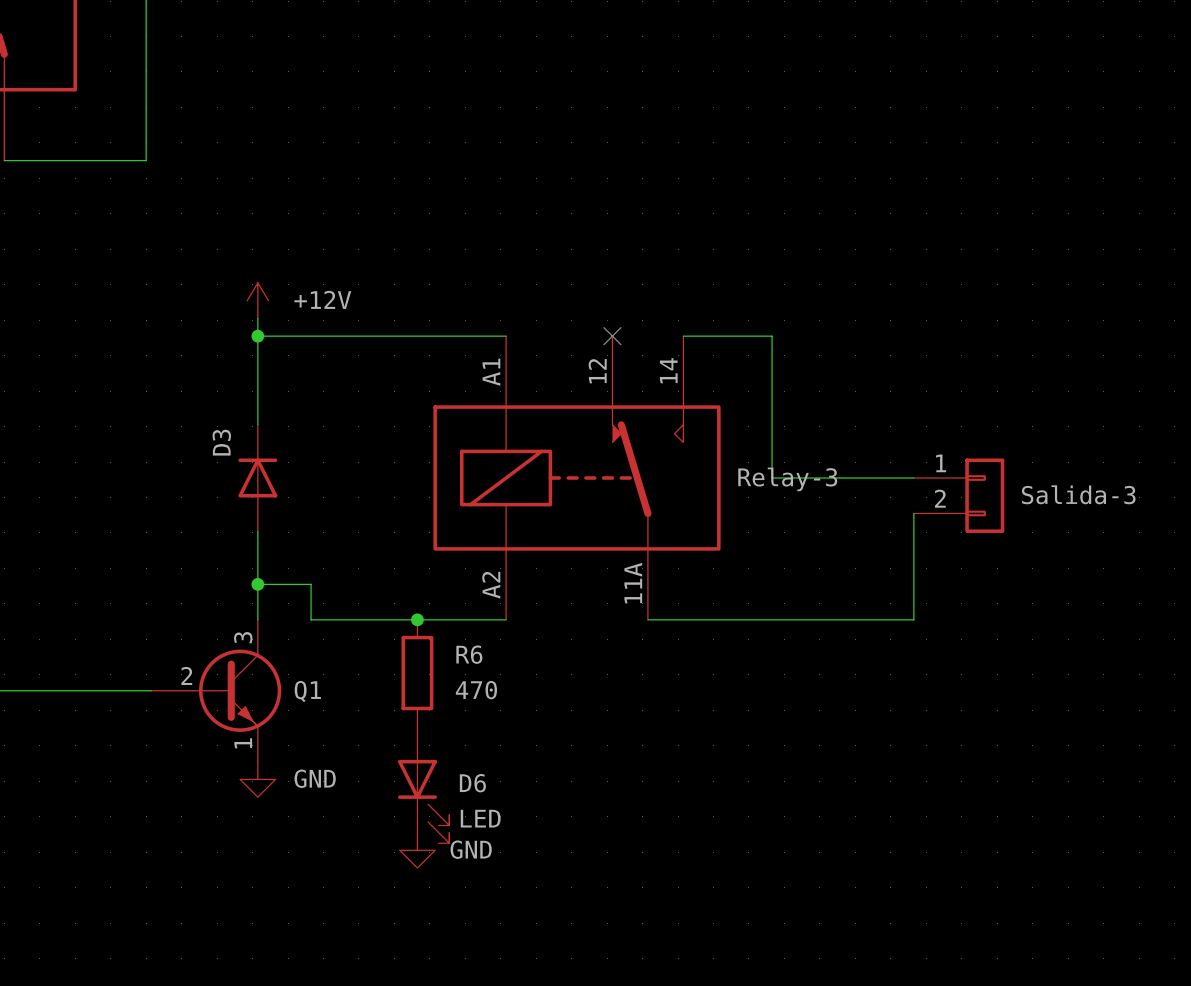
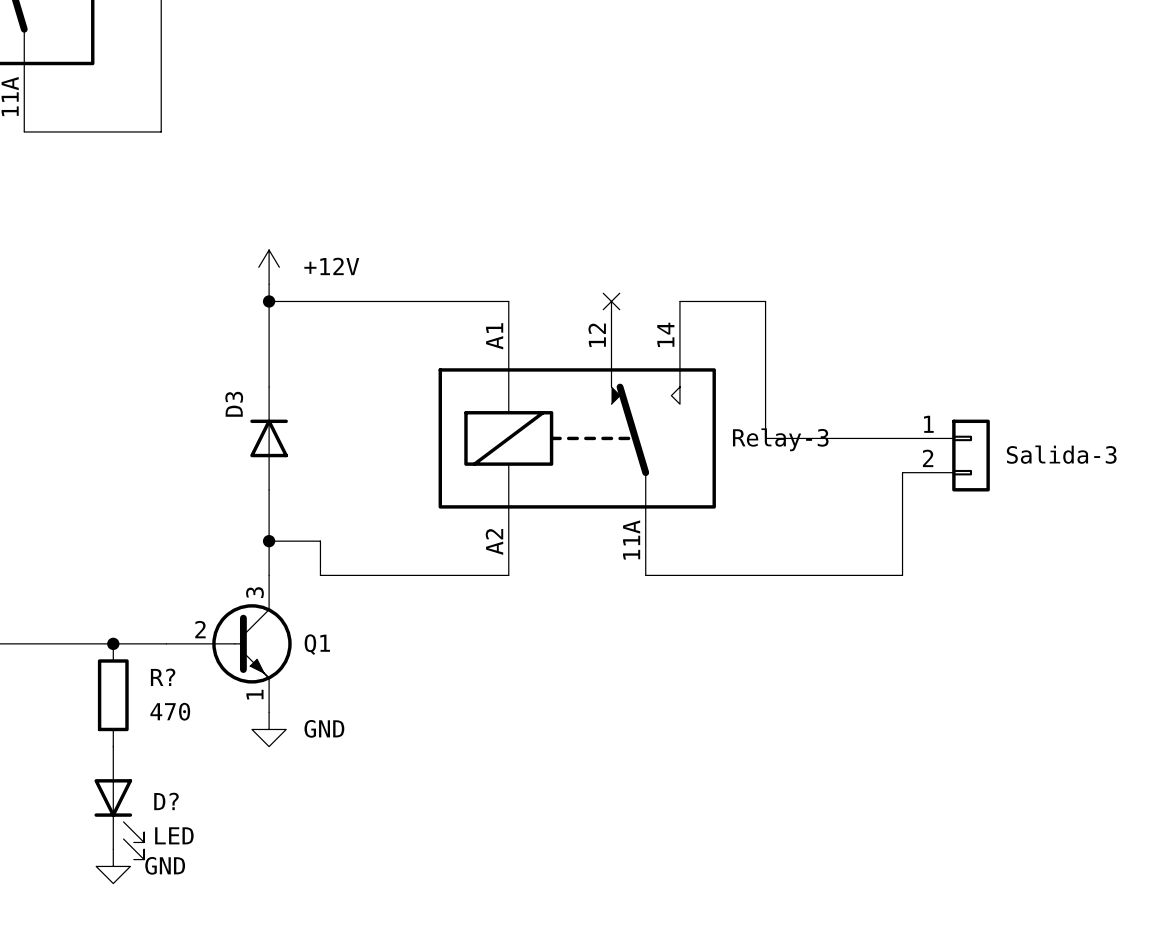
junction: (417, 619) -> none
R6: 470 (417, 673) -> none
junction: none -> (113, 643)
R?: none -> 470 (113, 695)
D6: LED (423, 784) -> none
power symbol position: GND (417, 850) -> GND (113, 866)
D?: none -> LED (119, 803)

